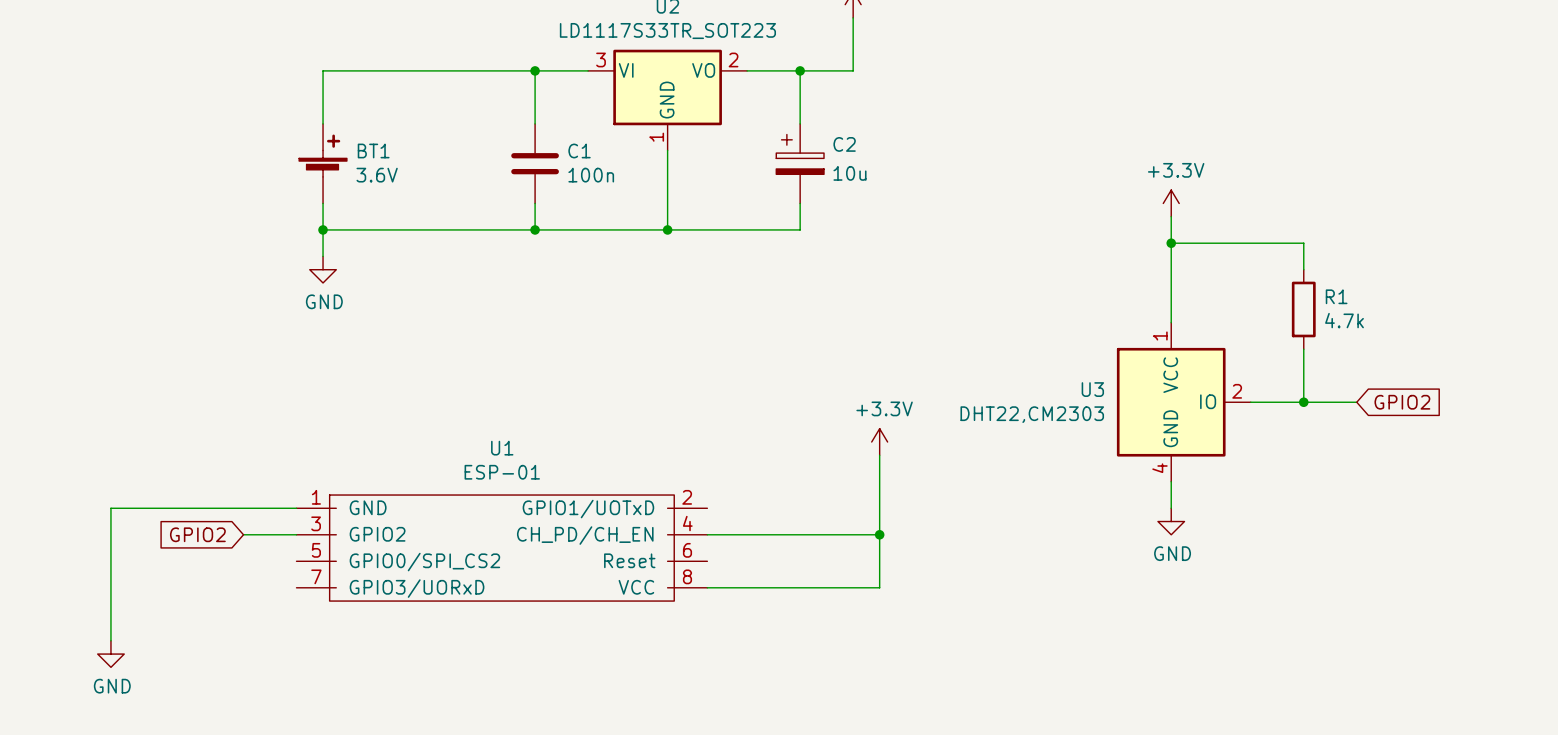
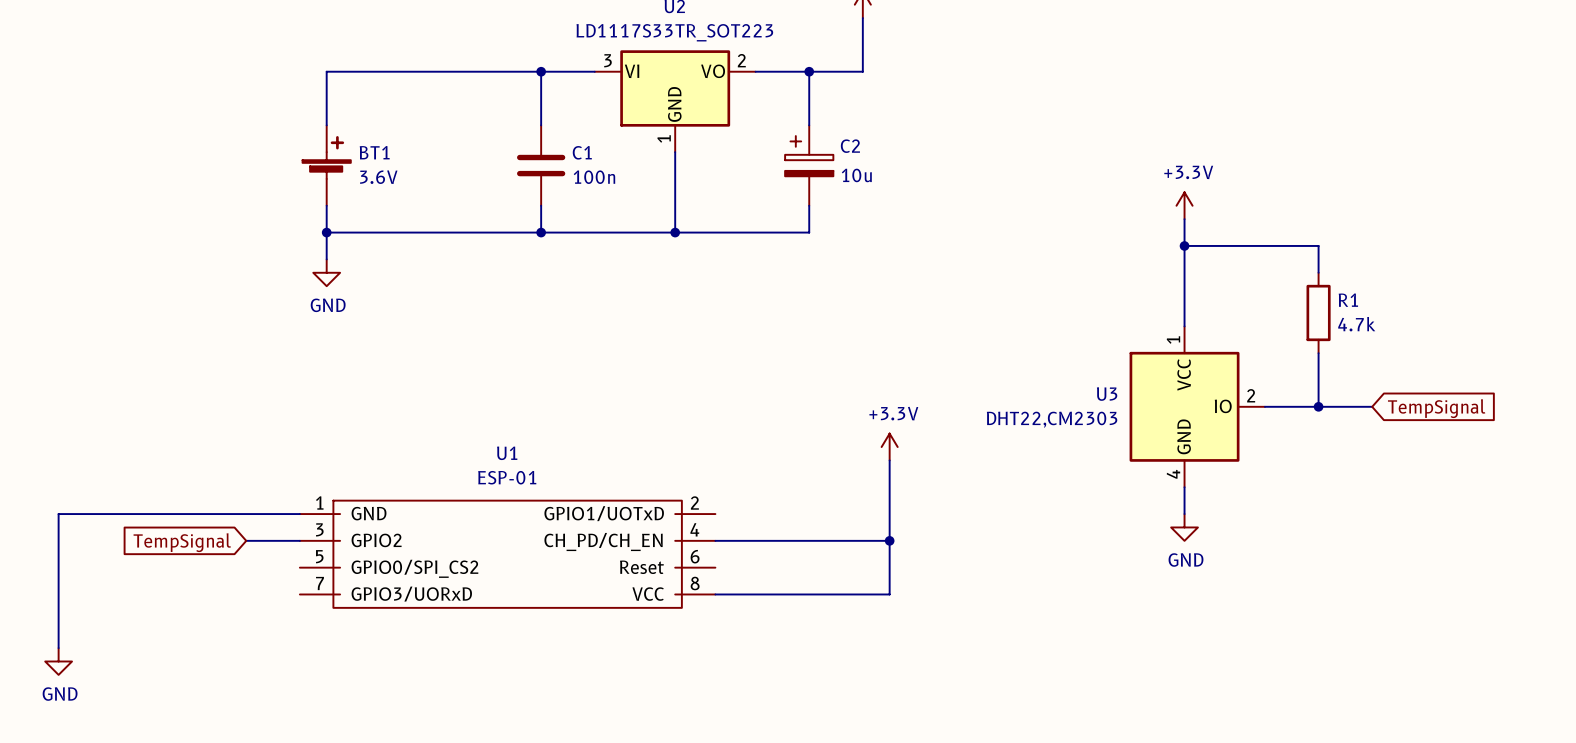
global label: GPIO2 (1402, 402) -> TempSignal (1436, 408)
wire: (110, 508) (110, 640) -> (112, 514) (58, 514) (58, 648)
global label: GPIO2 (197, 534) -> TempSignal (182, 542)
power symbol position: GND (110, 654) -> GND (58, 661)

